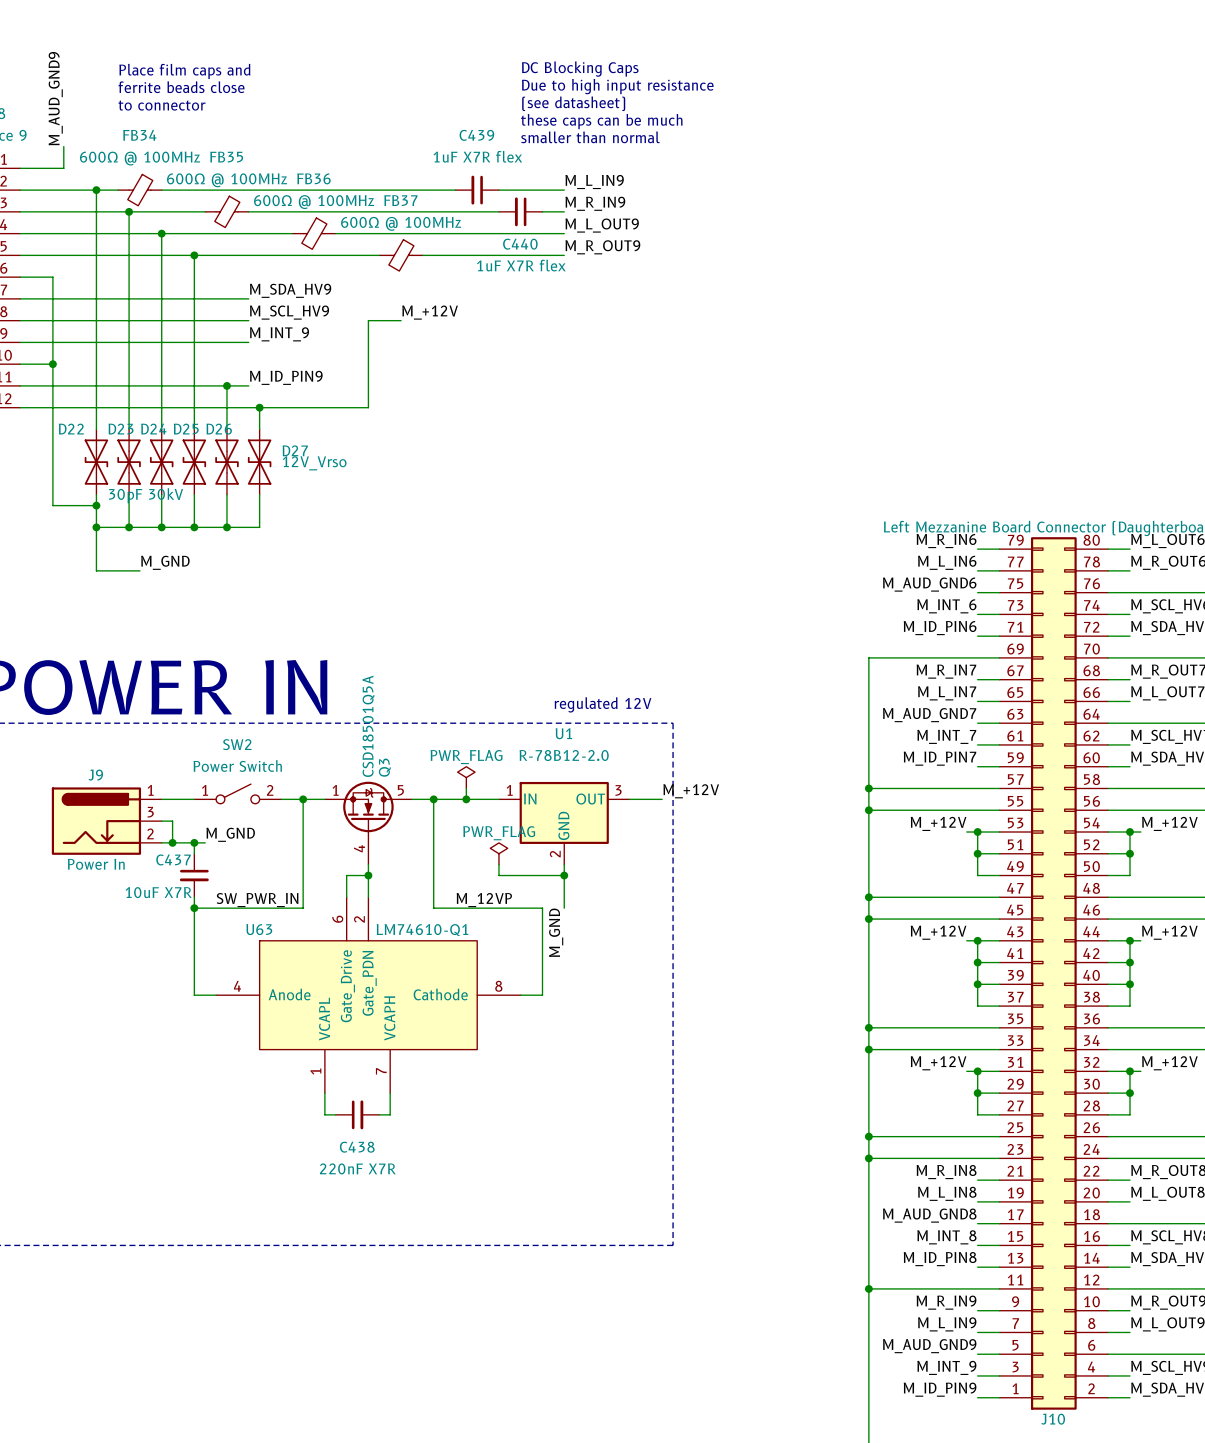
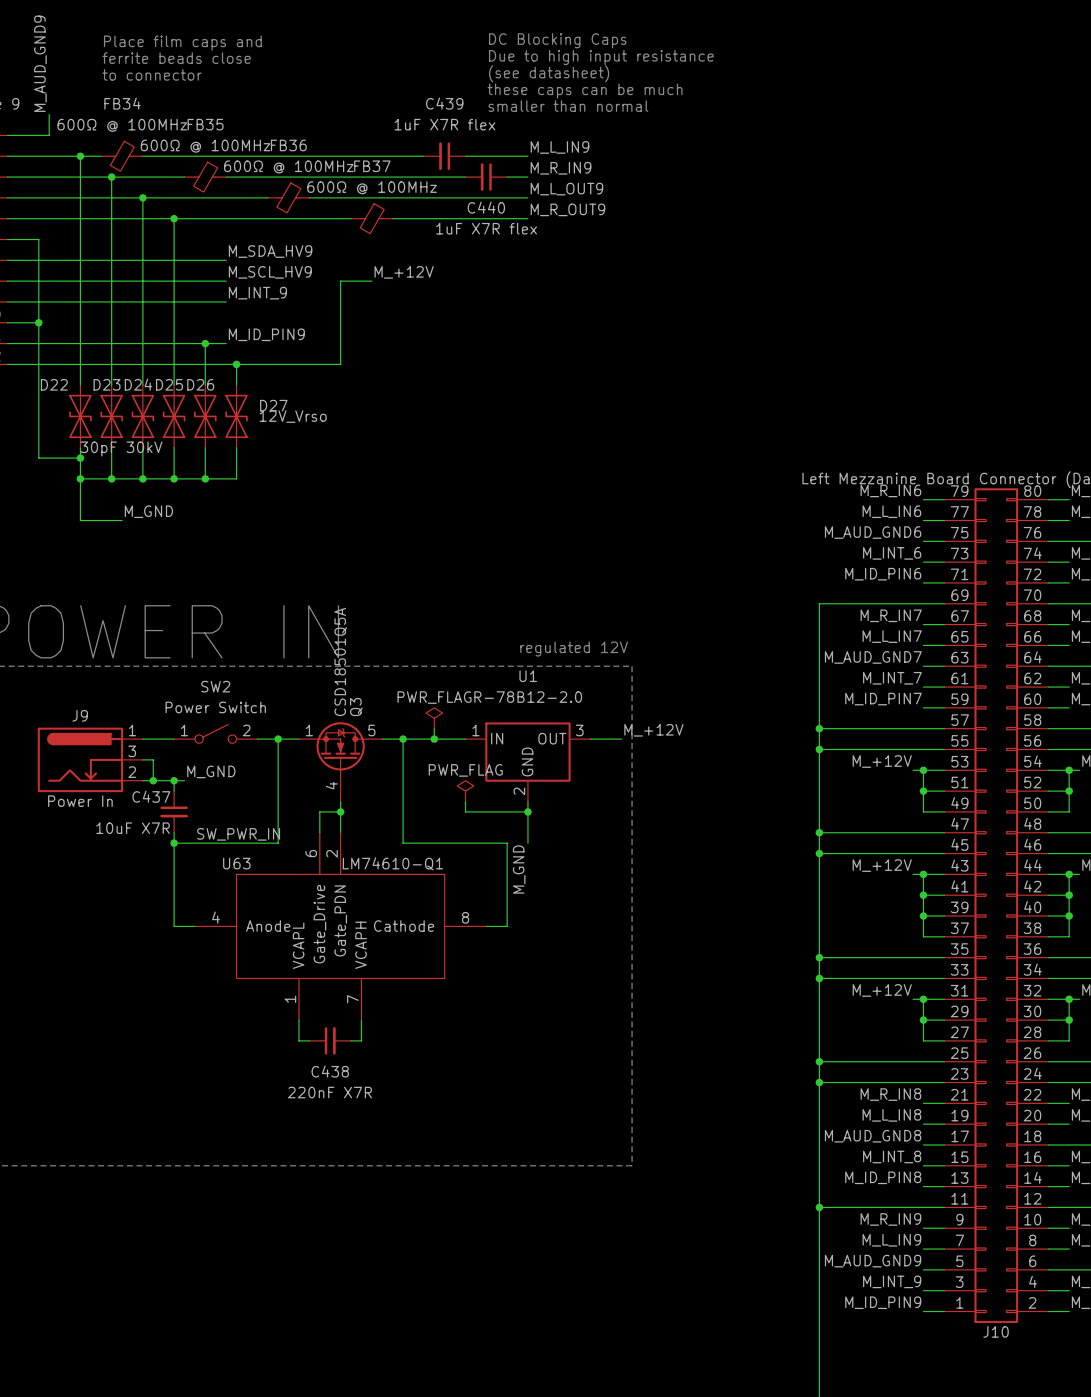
label: M_12VP (484, 900) -> none

